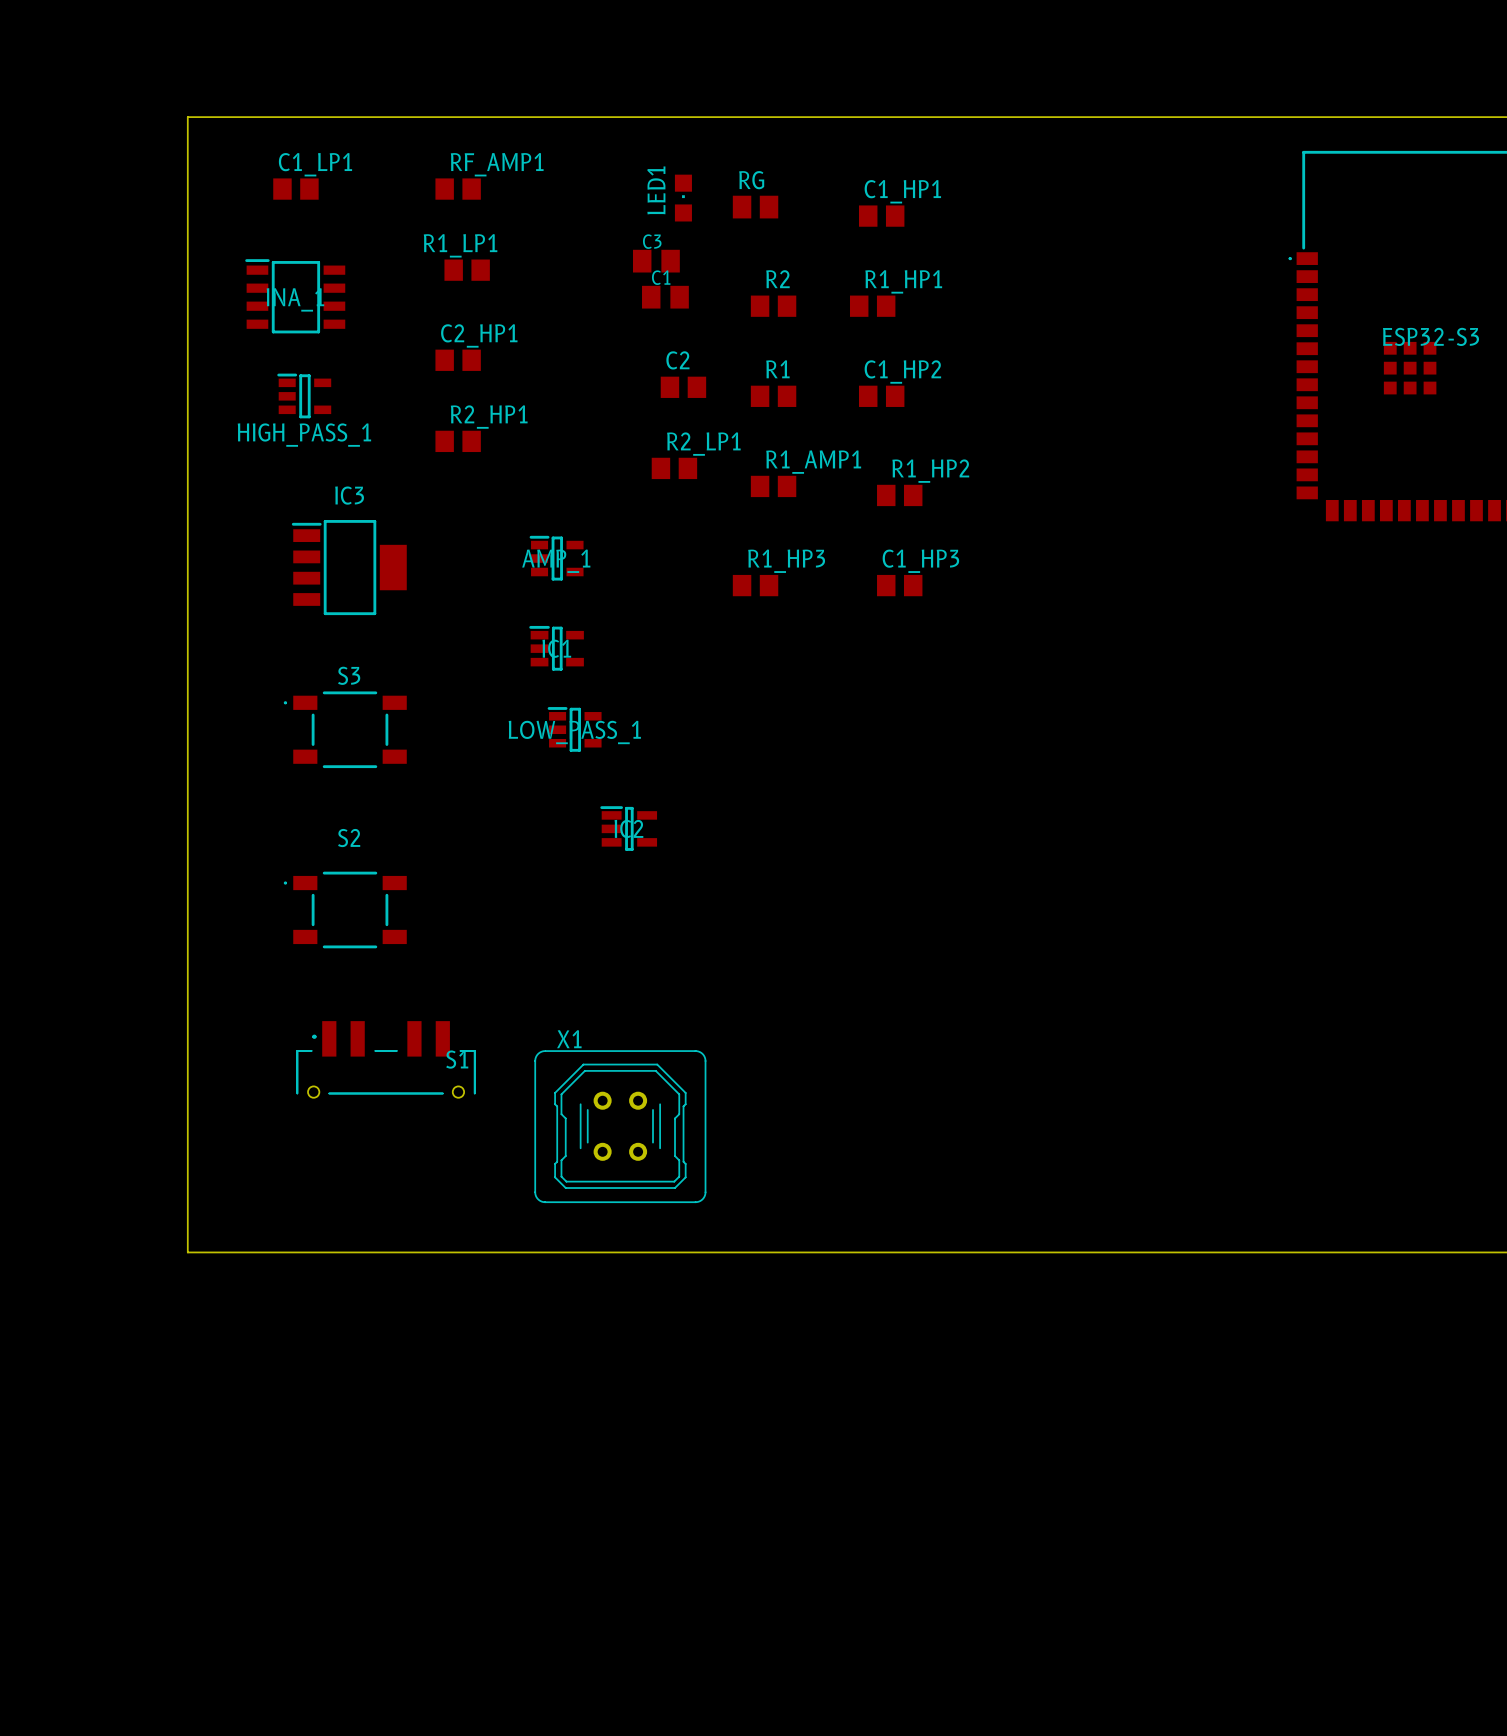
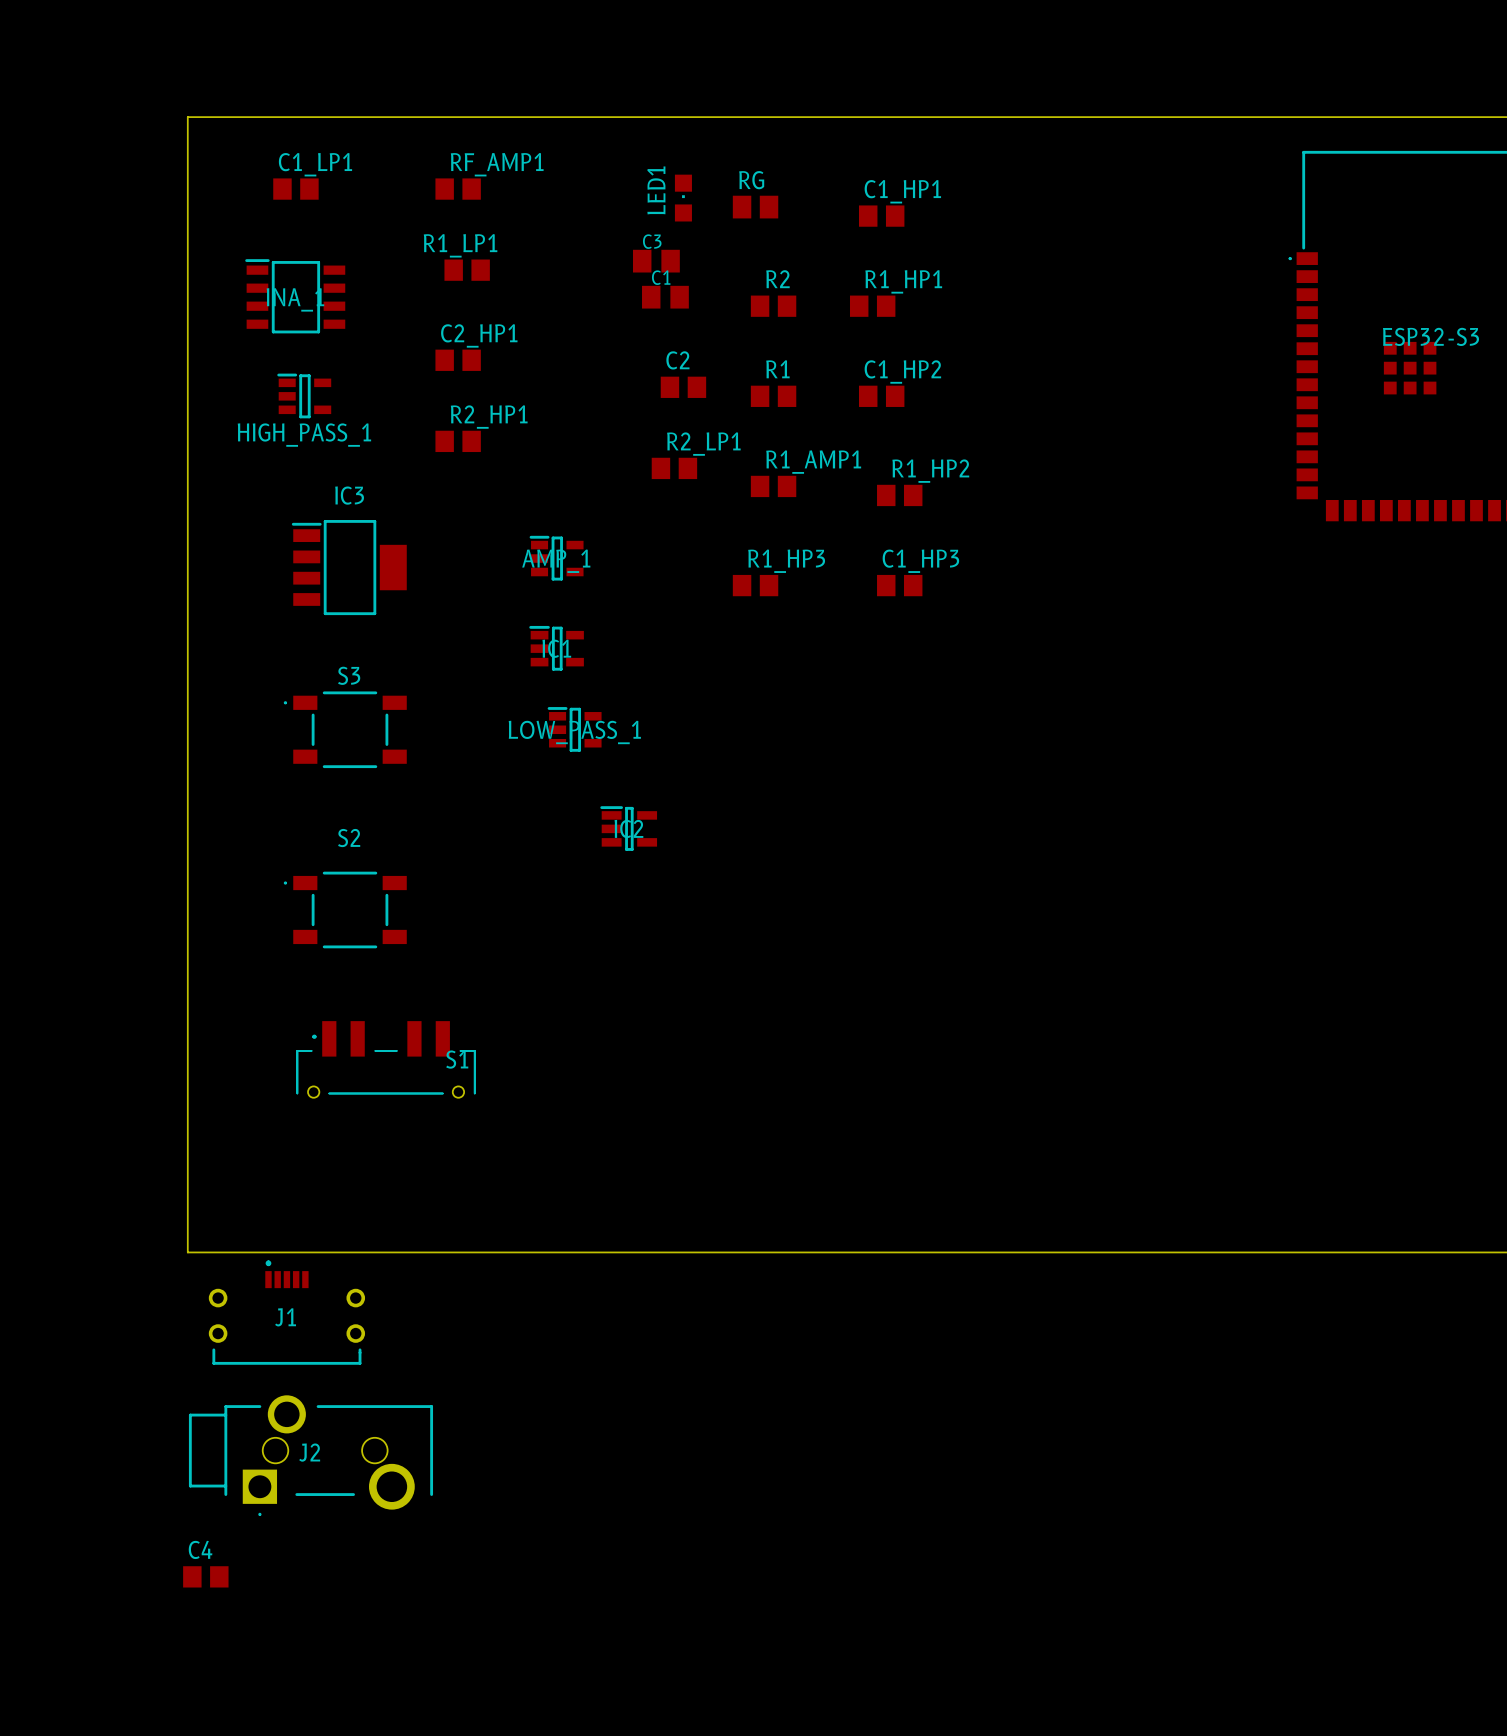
X1: (620, 1126) -> none
J1: none -> (286, 1312)
J2: none -> (310, 1455)
C4: none -> (205, 1576)

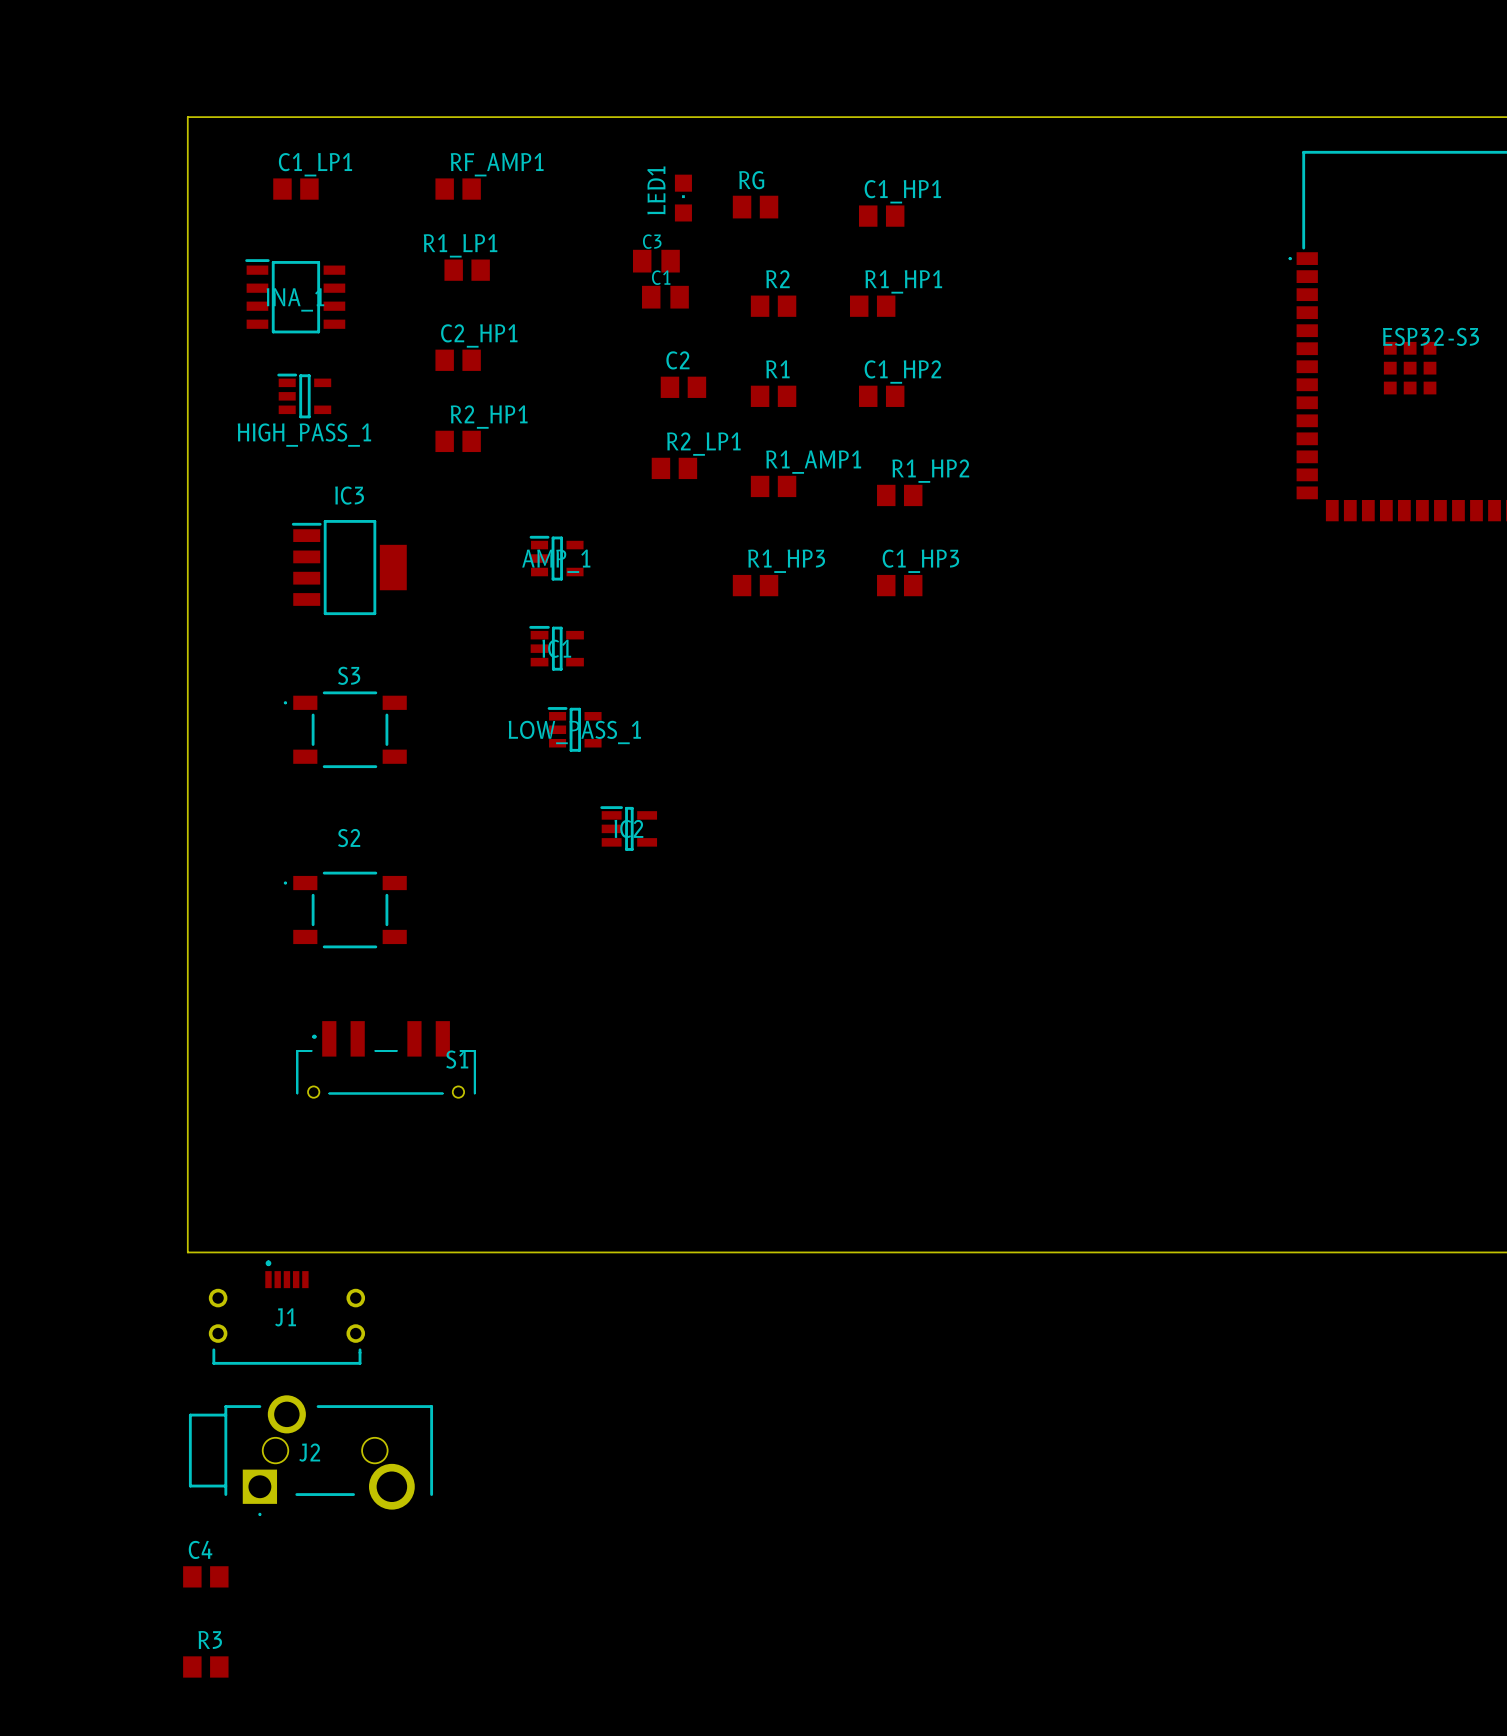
R3: none -> (205, 1666)

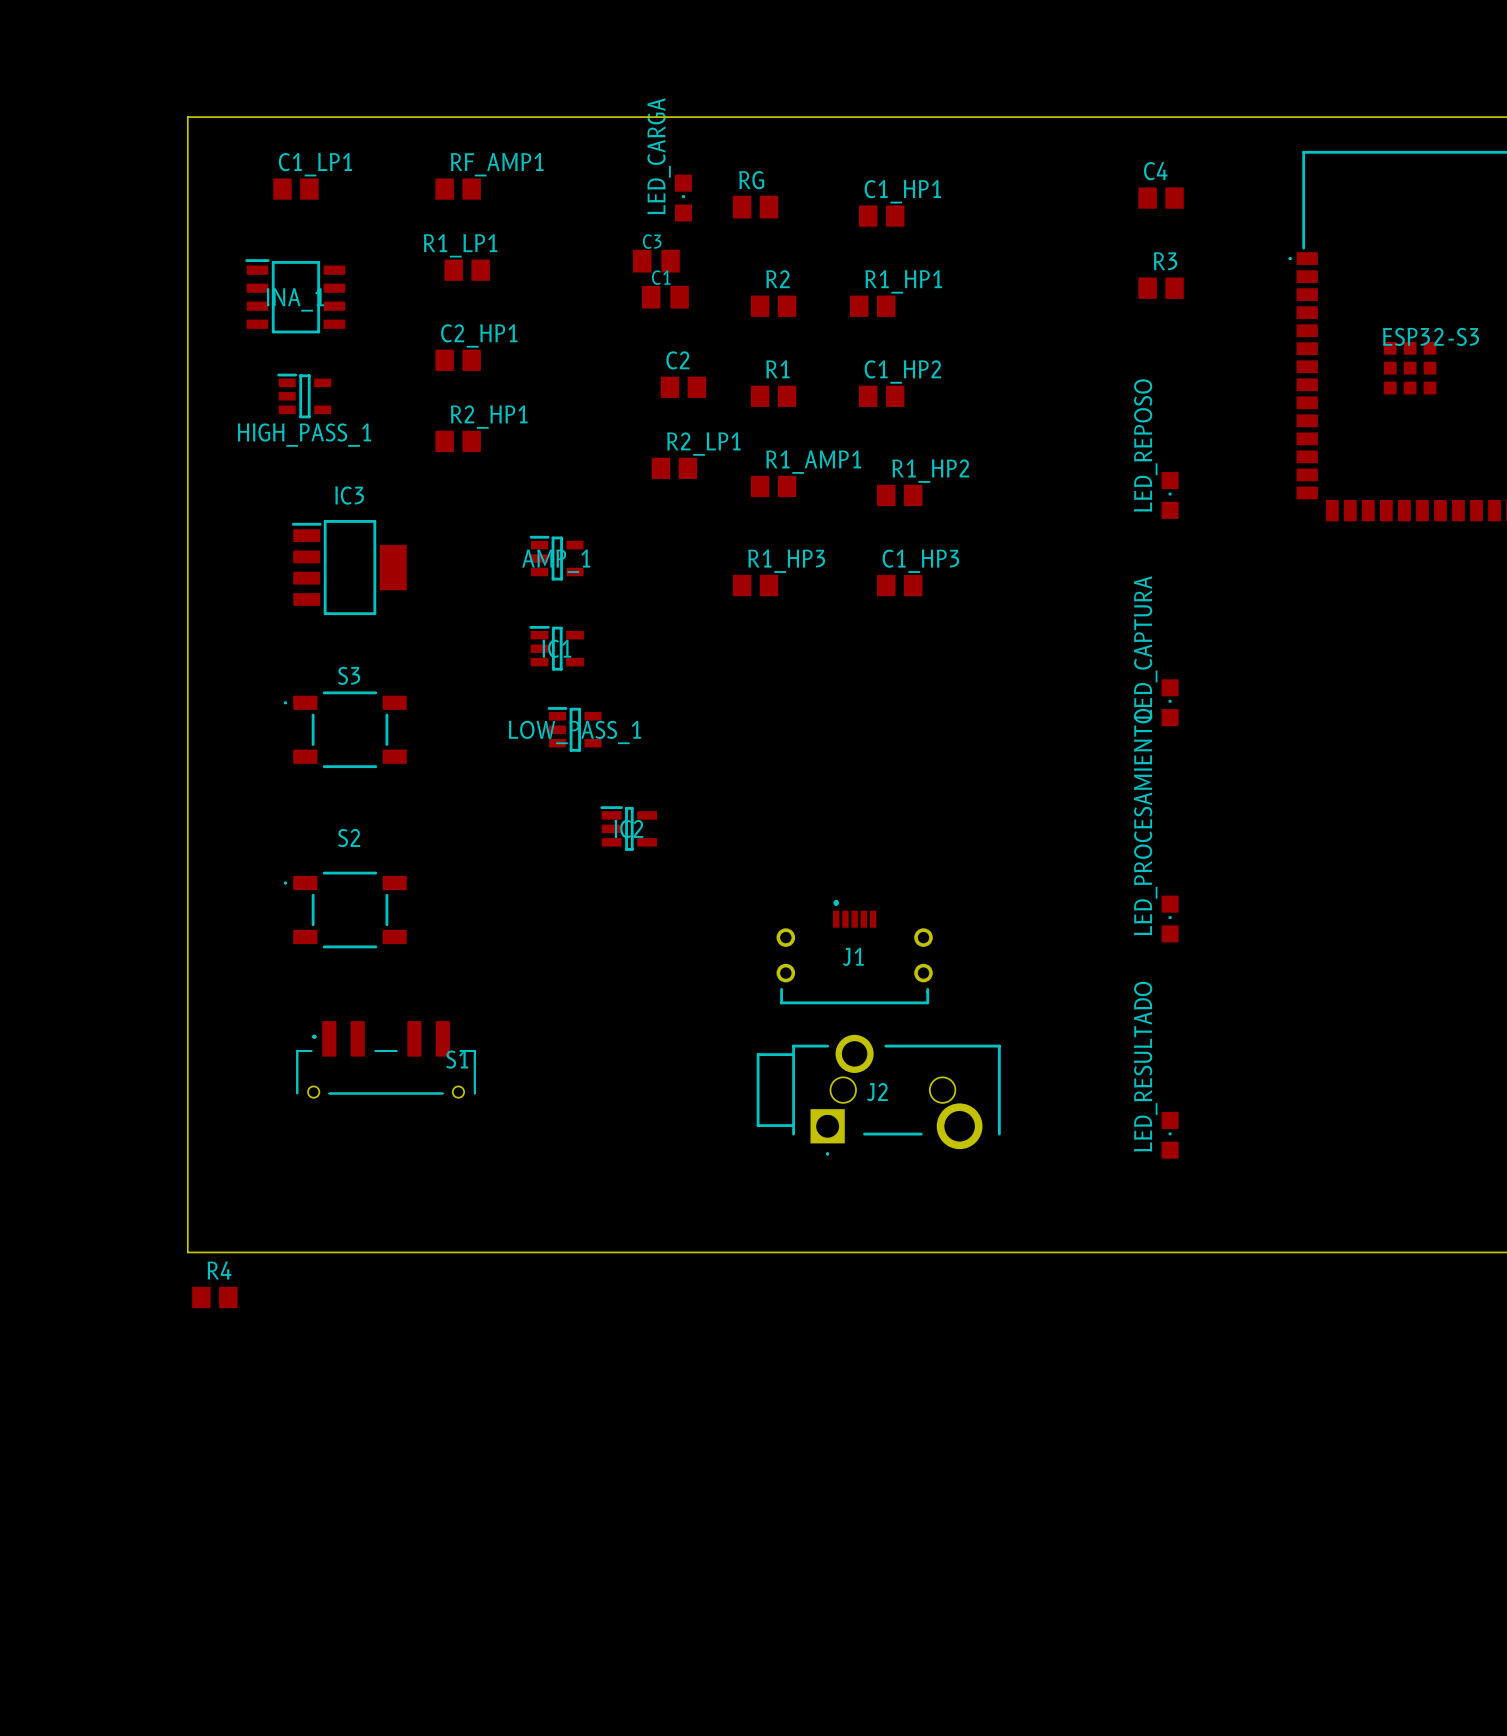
LED1 name: LED1 (656, 190) -> LED_CARGA (659, 156)
LED_REPOSO: none -> (1170, 495)
LED_CAPTURA: none -> (1170, 702)
LED_PROCESAMIENTO: none -> (1170, 919)
LED_RESULTADO: none -> (1170, 1135)
R4: none -> (214, 1297)
J1 position: (286, 1312) -> (854, 952)
J2 position: (310, 1455) -> (878, 1095)
C4 position: (205, 1576) -> (1161, 198)
R3 position: (205, 1666) -> (1161, 288)

